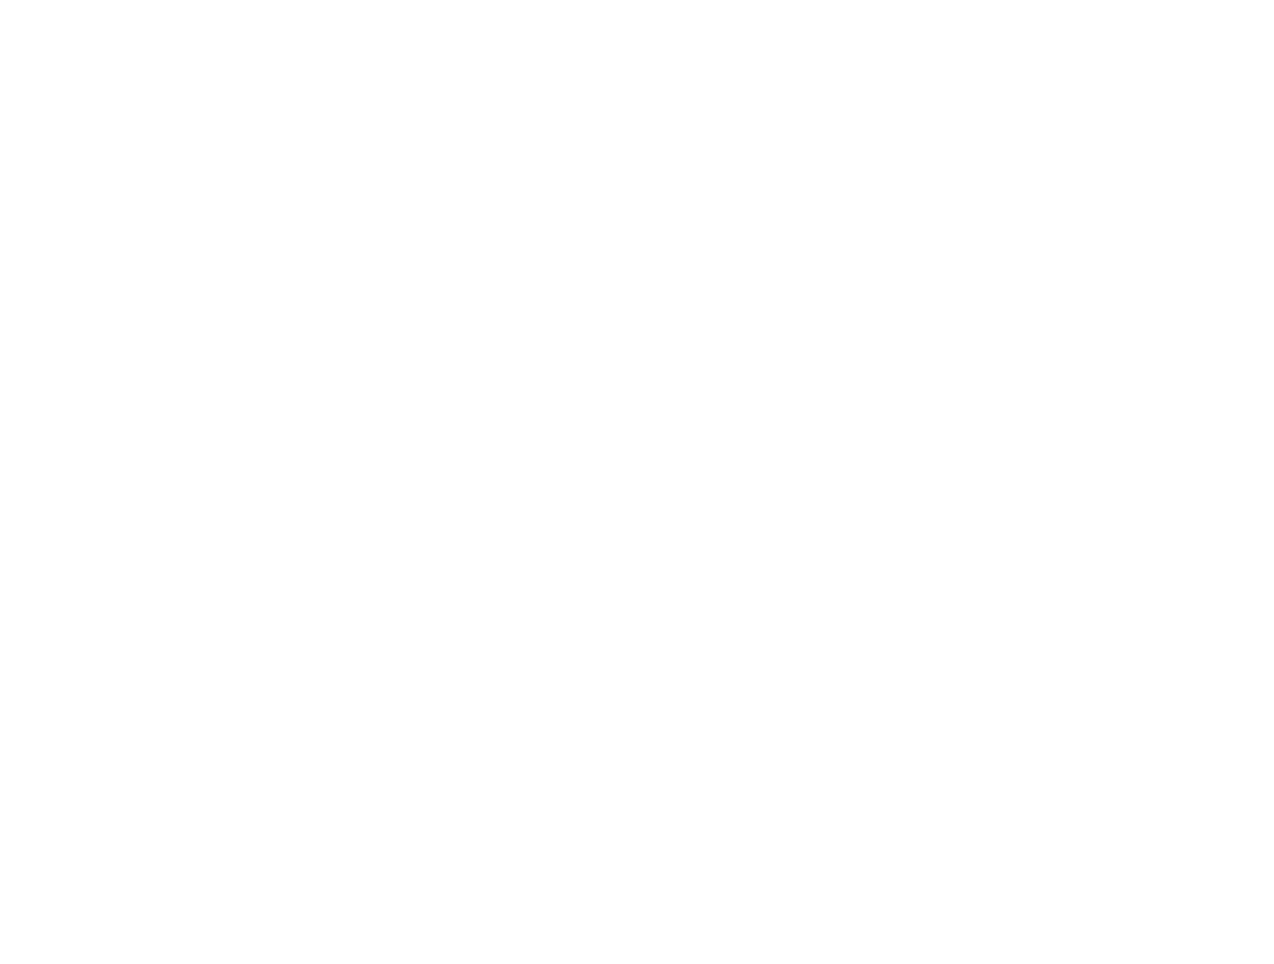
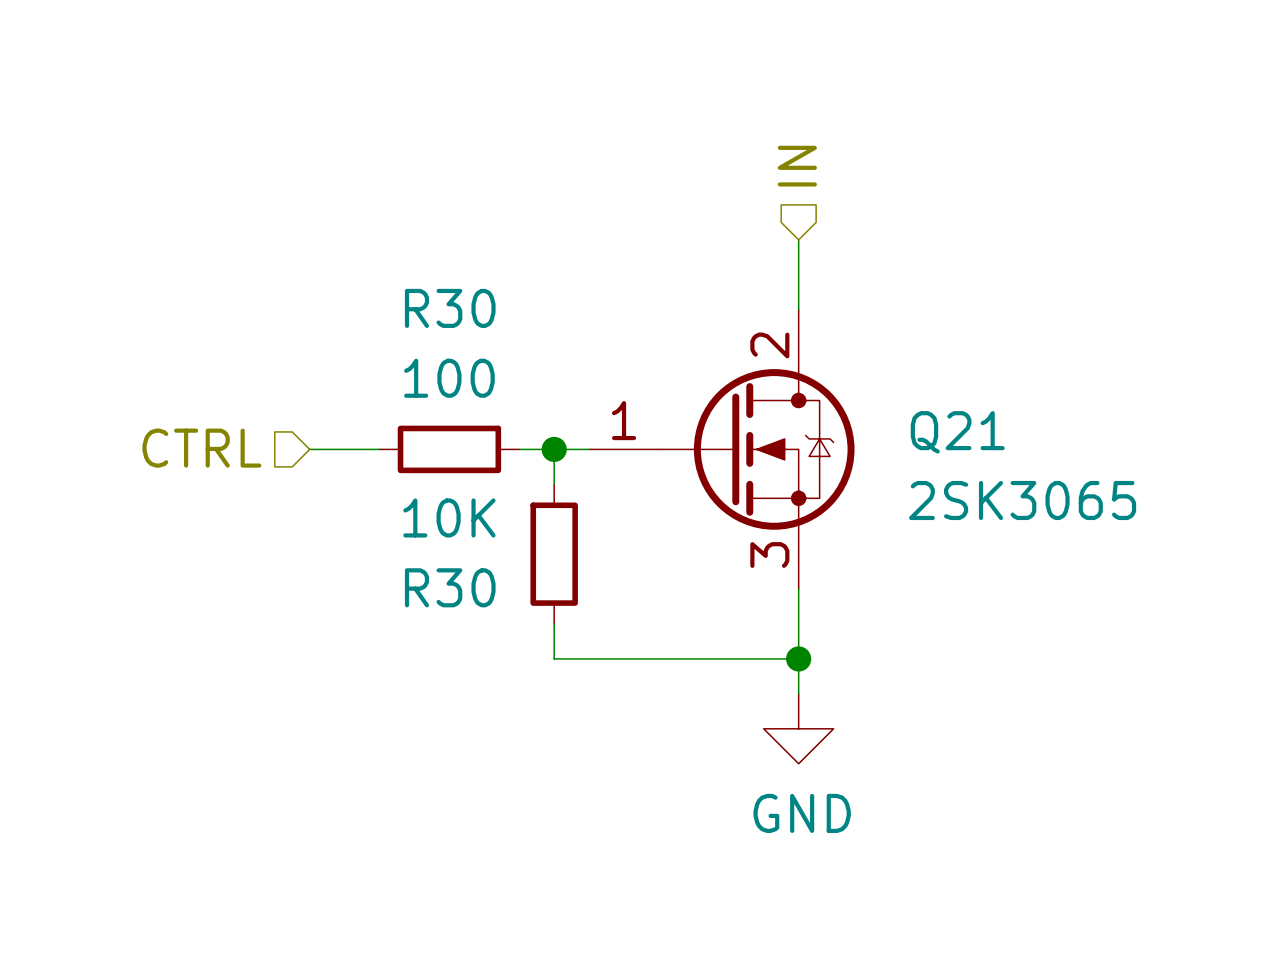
hierarchical label: none -> IN (797, 166)
wire: none -> (798, 239) (798, 309)
hierarchical label: none -> CTRL (201, 448)
wire: none -> (309, 449) (379, 449)
R30: none -> 100 (449, 449)
wire: none -> (519, 449) (589, 449)
wire: none -> (554, 449) (554, 484)
junction: none -> (554, 449)
Q21: none -> 2SK3065 (721, 449)
R30: none -> 10K (554, 554)
wire: none -> (798, 589) (798, 693)
wire: none -> (554, 624) (554, 658) (798, 658)
junction: none -> (798, 658)
power symbol: none -> GND (798, 728)

